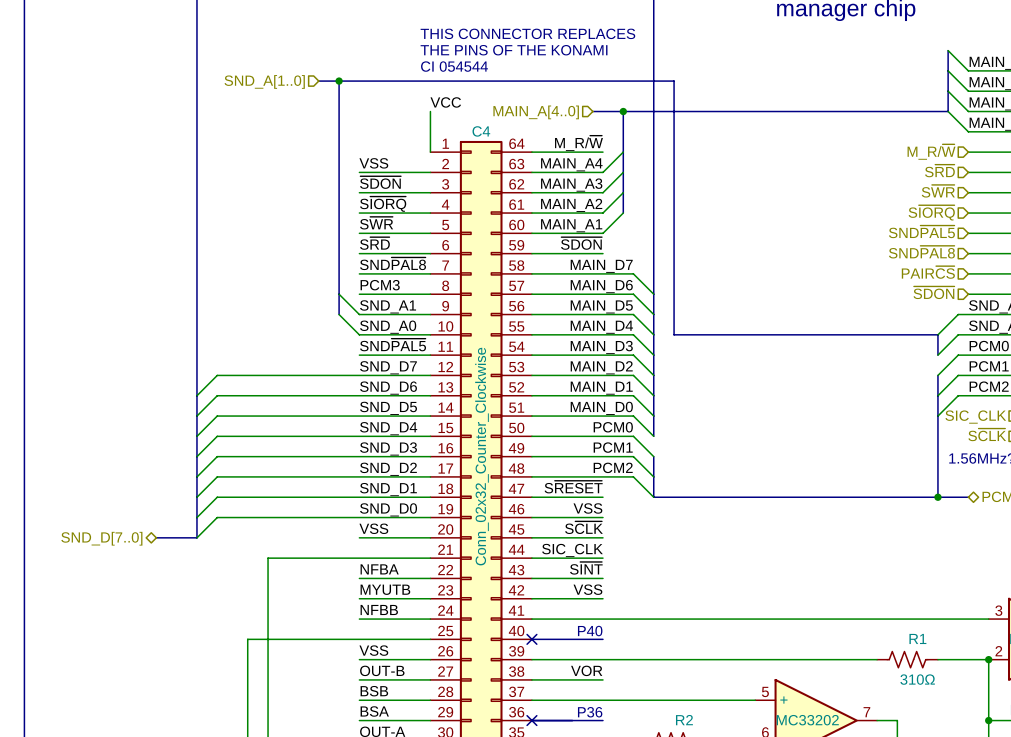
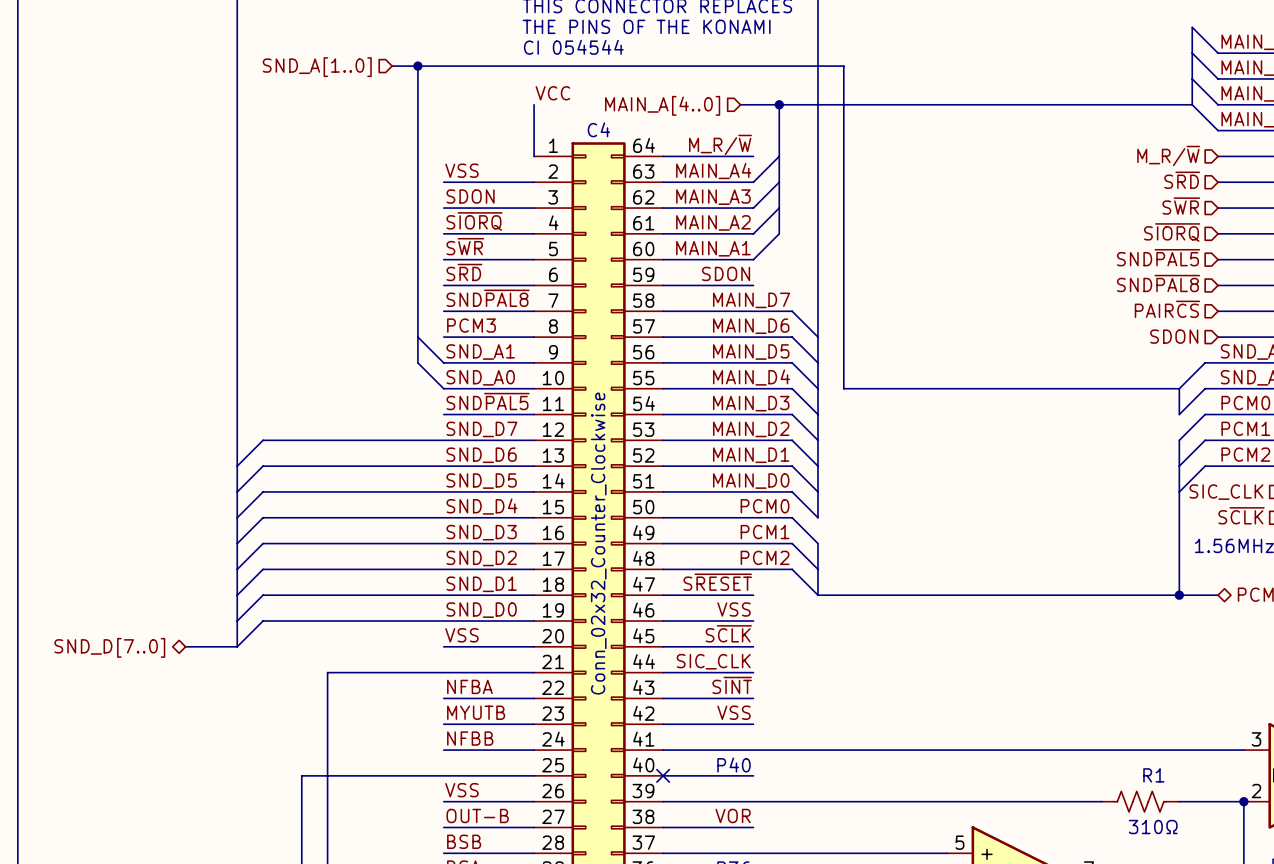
label: ~{SDON} (380, 182) -> SDON (470, 196)
label: ~{SDON} (581, 243) -> SDON (726, 273)
hierarchical label: ~{SDON} (934, 292) -> SDON (1174, 336)

